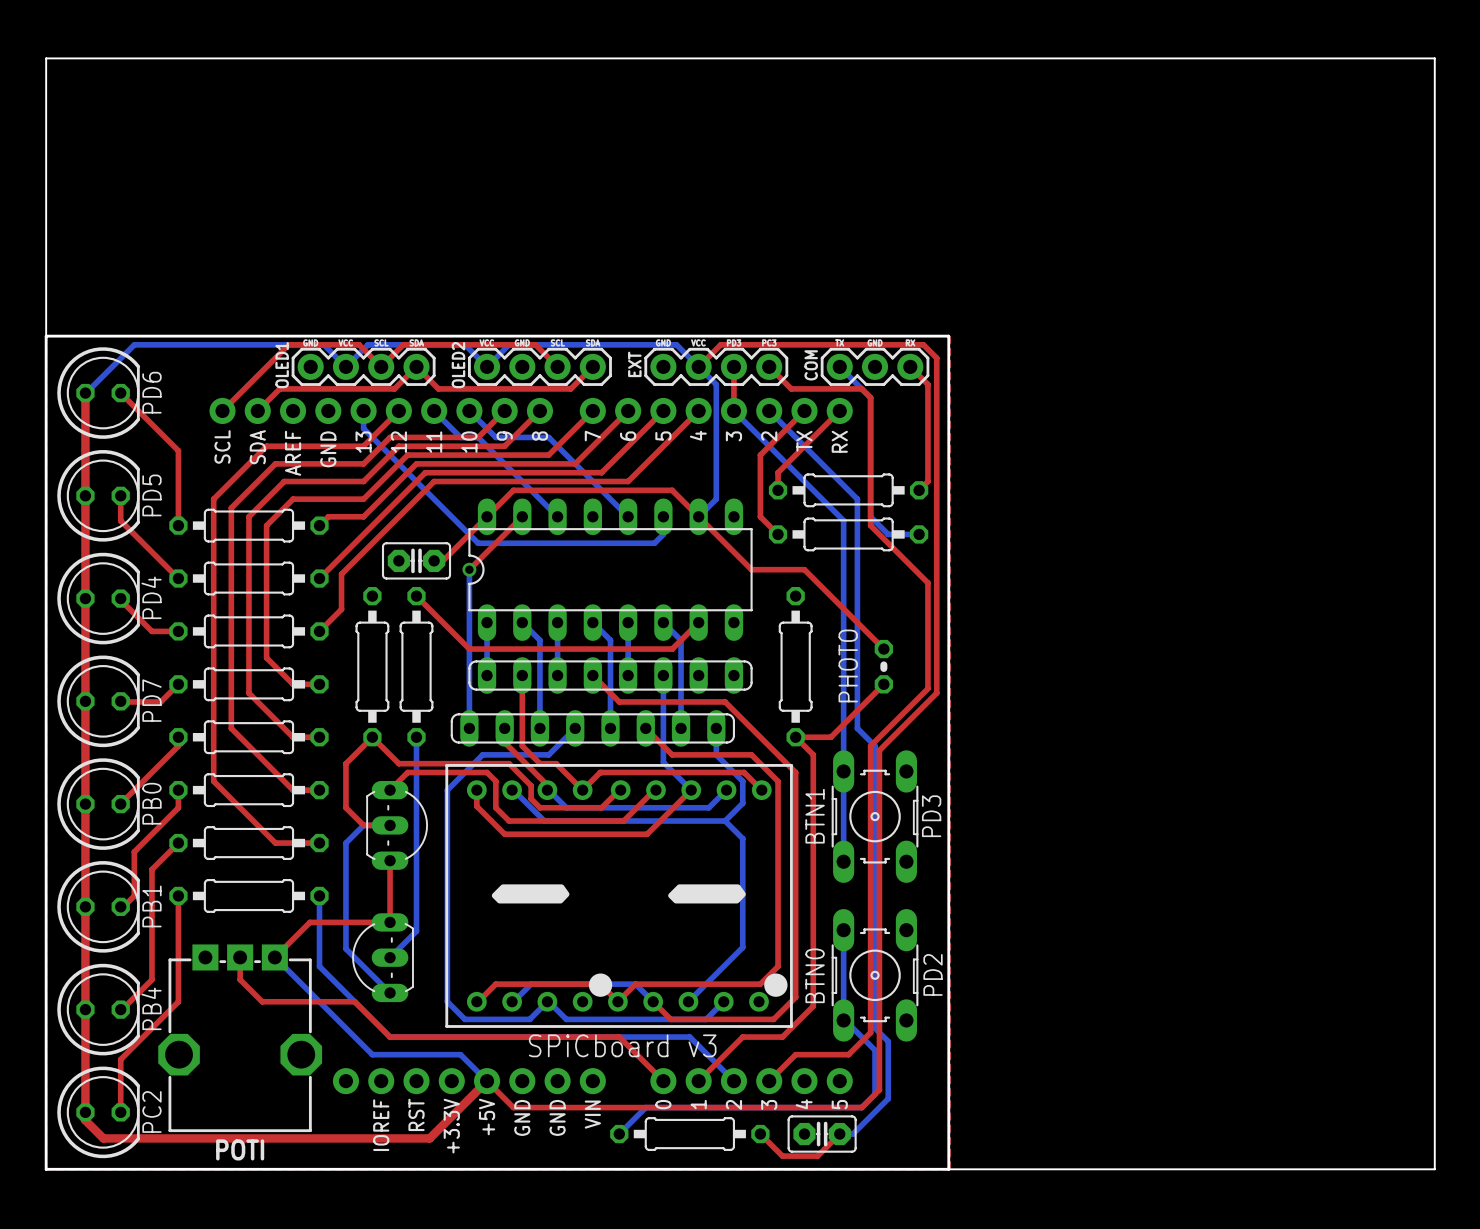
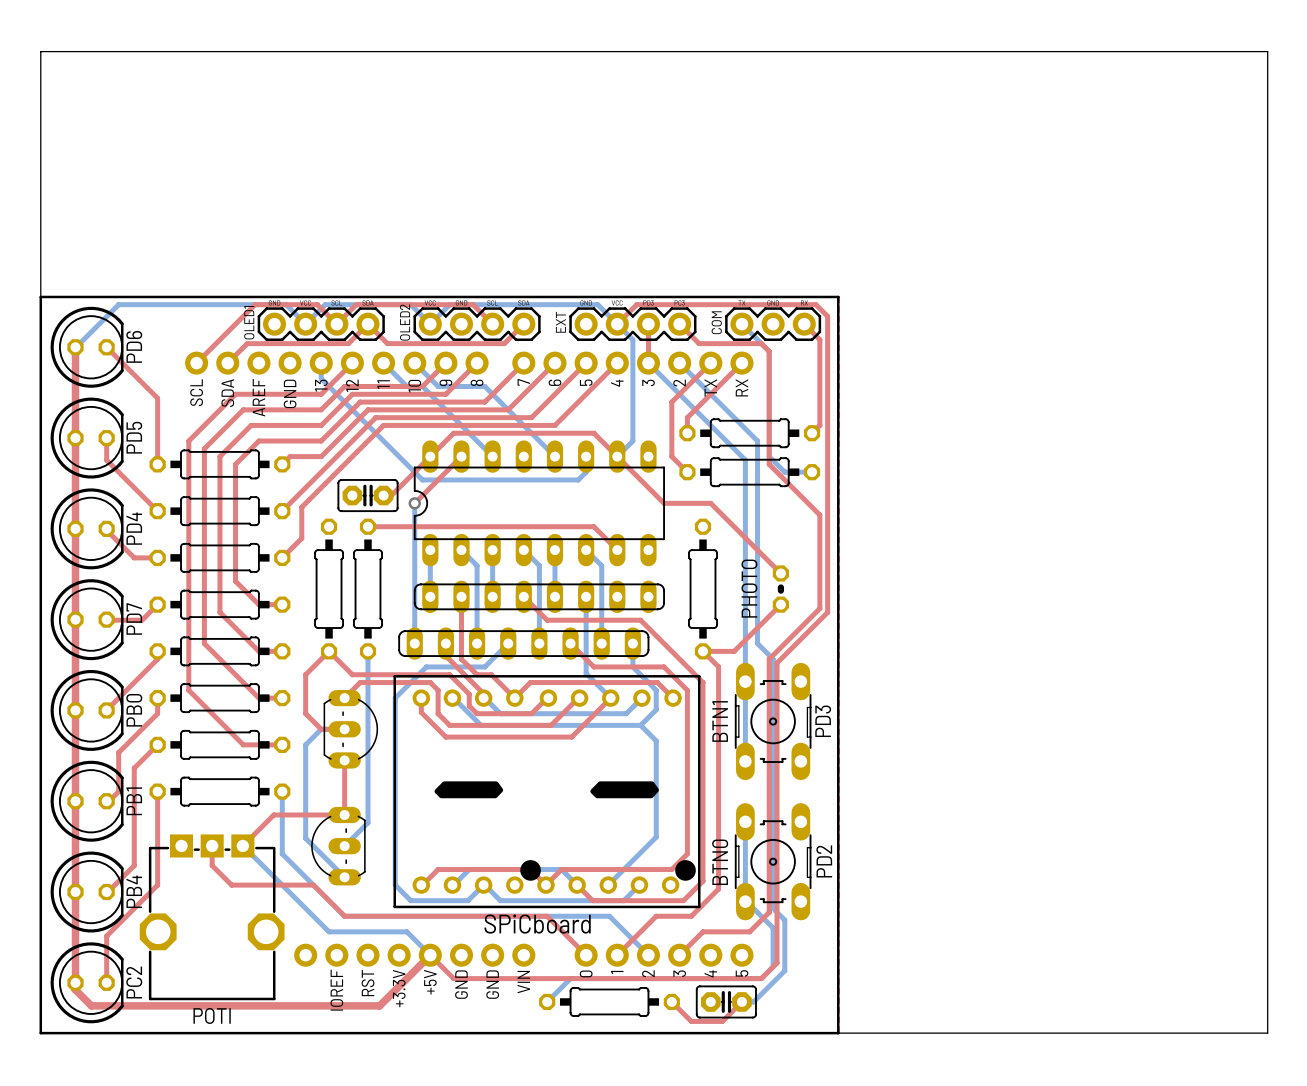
top track: (416, 596) (469, 649) (672, 649) (698, 622) -> (368, 526) (593, 526) (617, 550)
text: SPiCboard v3 (622, 1045) -> SPiCboard (537, 924)

